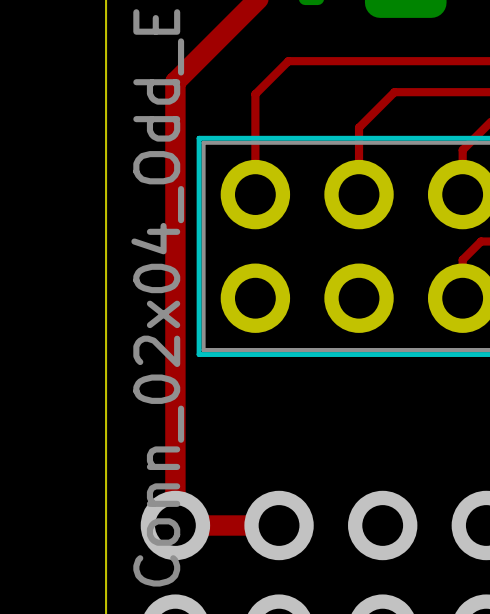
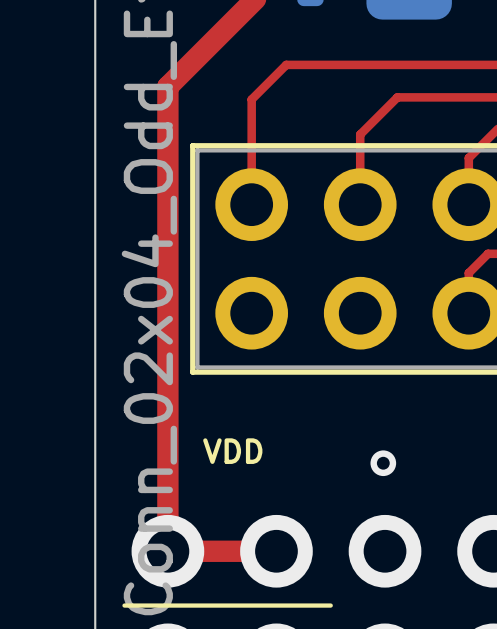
text: none -> VDD (232, 451)
via: none -> (383, 463)
line: none -> (124, 605) (330, 605)

